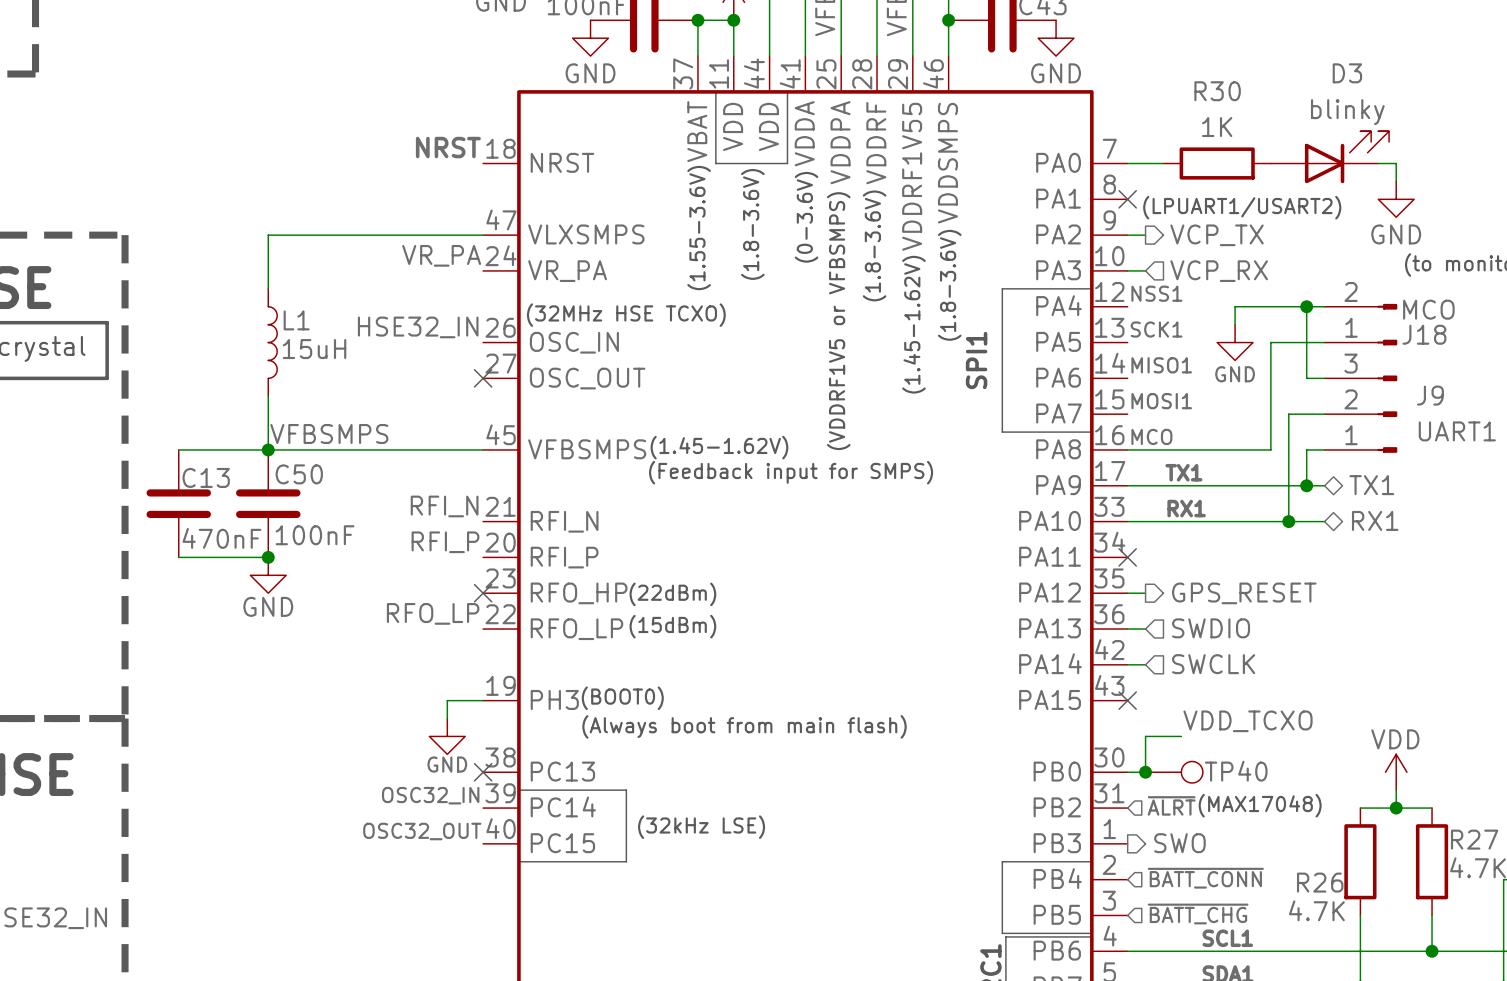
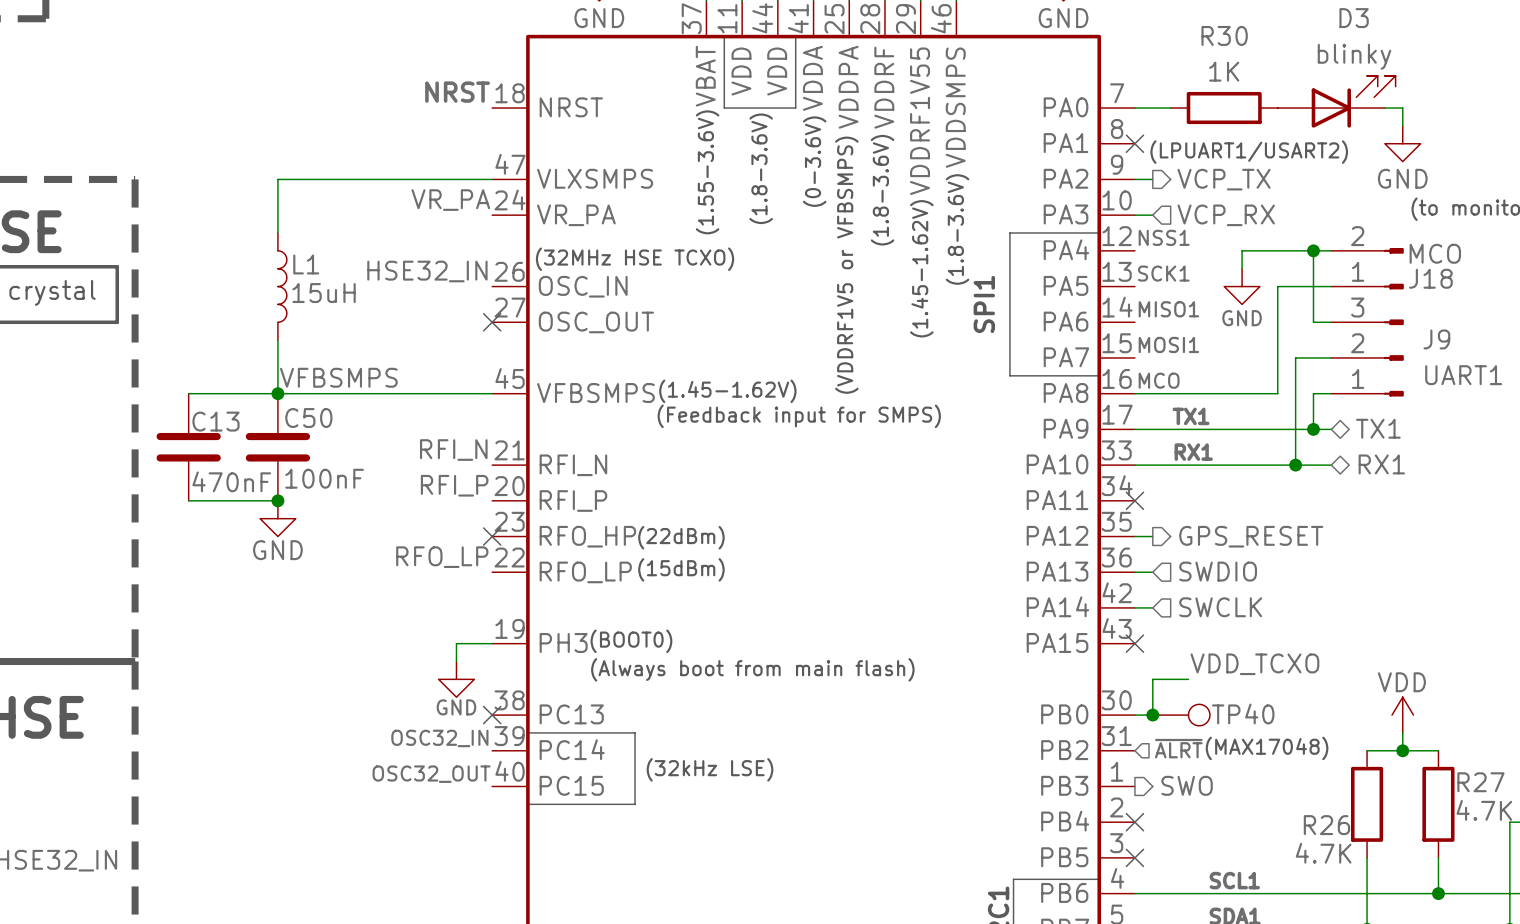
line: (1002, 861) (1091, 861) (1091, 933) (1002, 933) (1002, 861) -> none
hierarchical label: ~{BATT_CONN} (1205, 878) -> none
no-connect mark: none -> (1134, 822)
hierarchical label: ~{BATT_CHG} (1198, 914) -> none
no-connect mark: none -> (1134, 857)

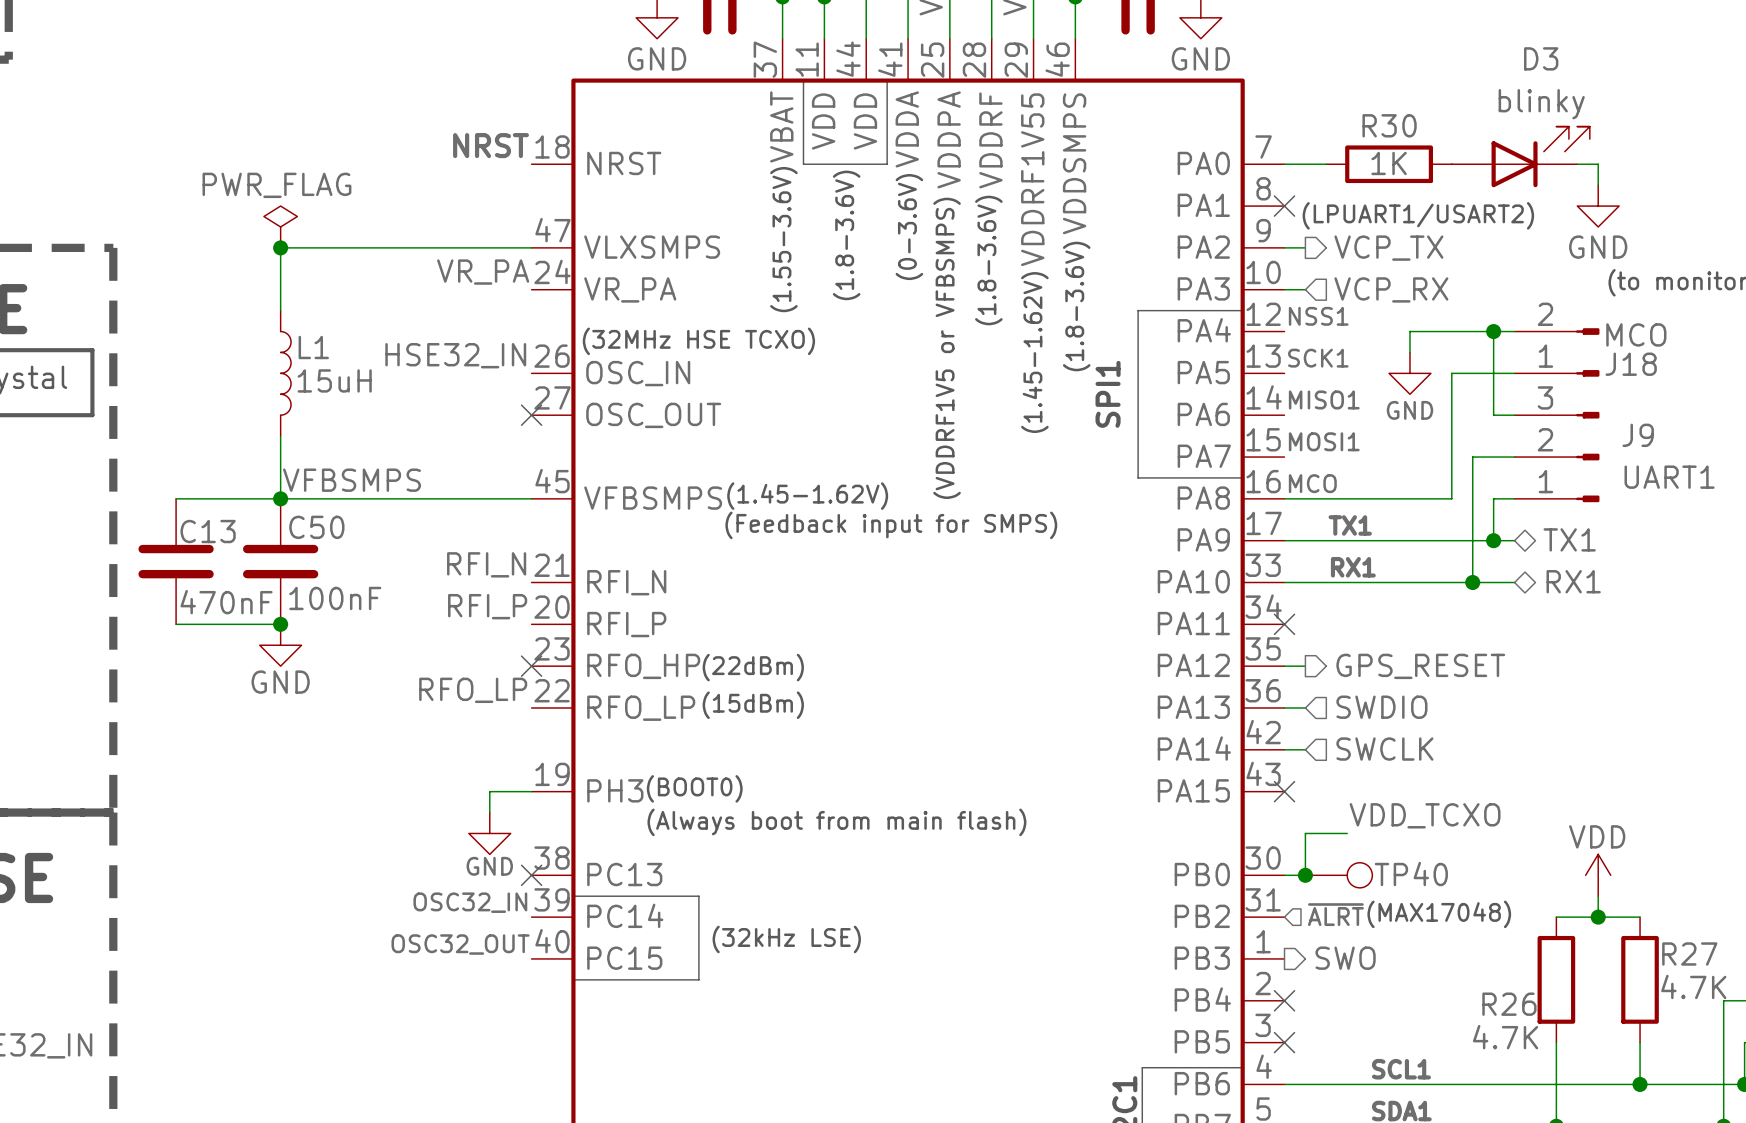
R30 name position: R30 (1224, 35) -> R30 (1389, 125)
R30 value position: 1K (1224, 71) -> 1K (1389, 163)
power symbol: none -> PWR_FLAG (280, 226)
junction: none -> (280, 247)

